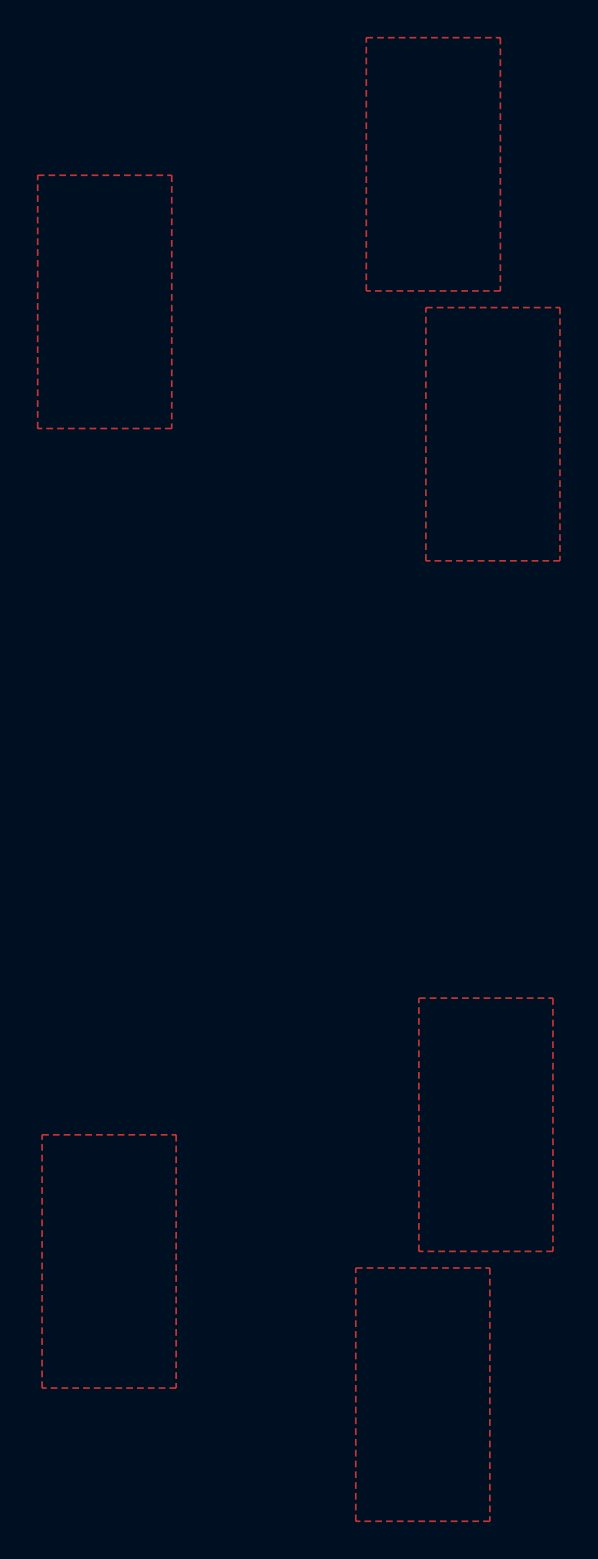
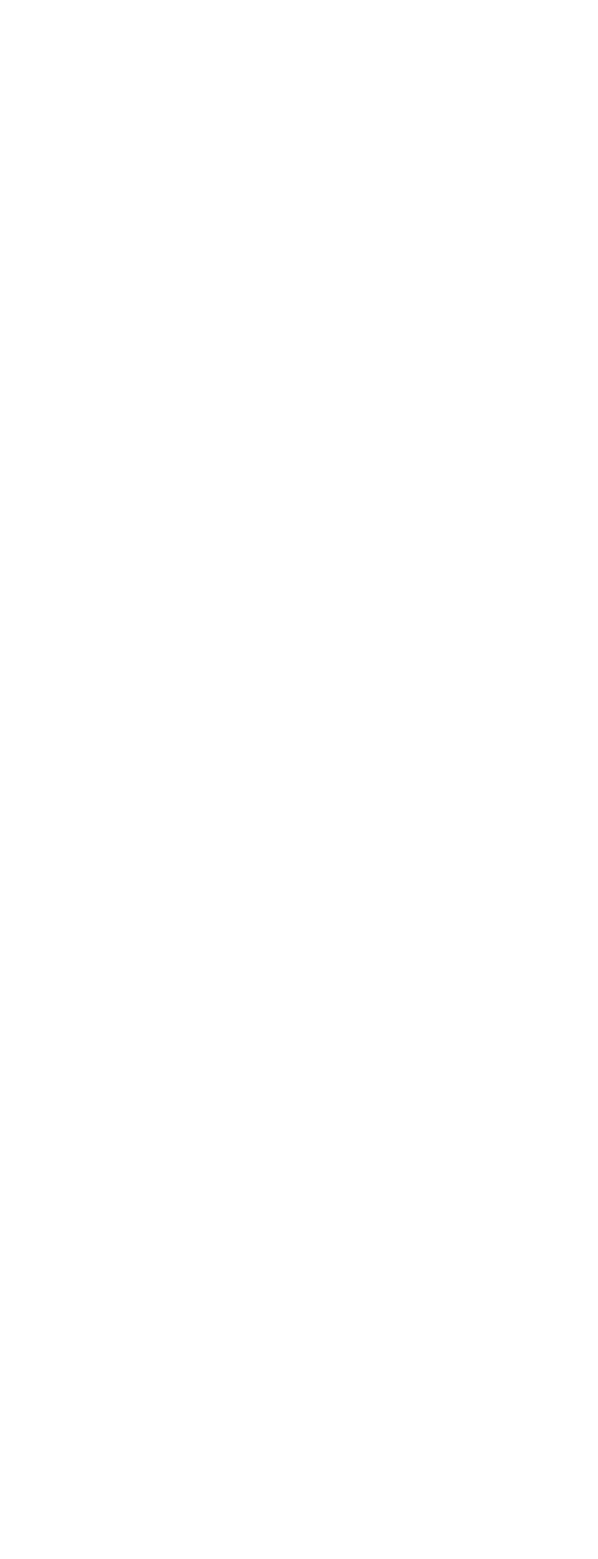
zone outline: (366, 37) (500, 37) (500, 290) (366, 290) (366, 37) -> none
zone outline: (37, 175) (37, 428) (171, 428) (171, 175) (37, 175) -> none
zone outline: (425, 307) (559, 307) (559, 560) (425, 560) (425, 307) -> none
zone outline: (418, 998) (552, 998) (552, 1251) (418, 1251) (418, 998) -> none
zone outline: (42, 1134) (42, 1388) (176, 1388) (176, 1134) (42, 1134) -> none
zone outline: (355, 1268) (489, 1268) (489, 1521) (355, 1521) (355, 1268) -> none

